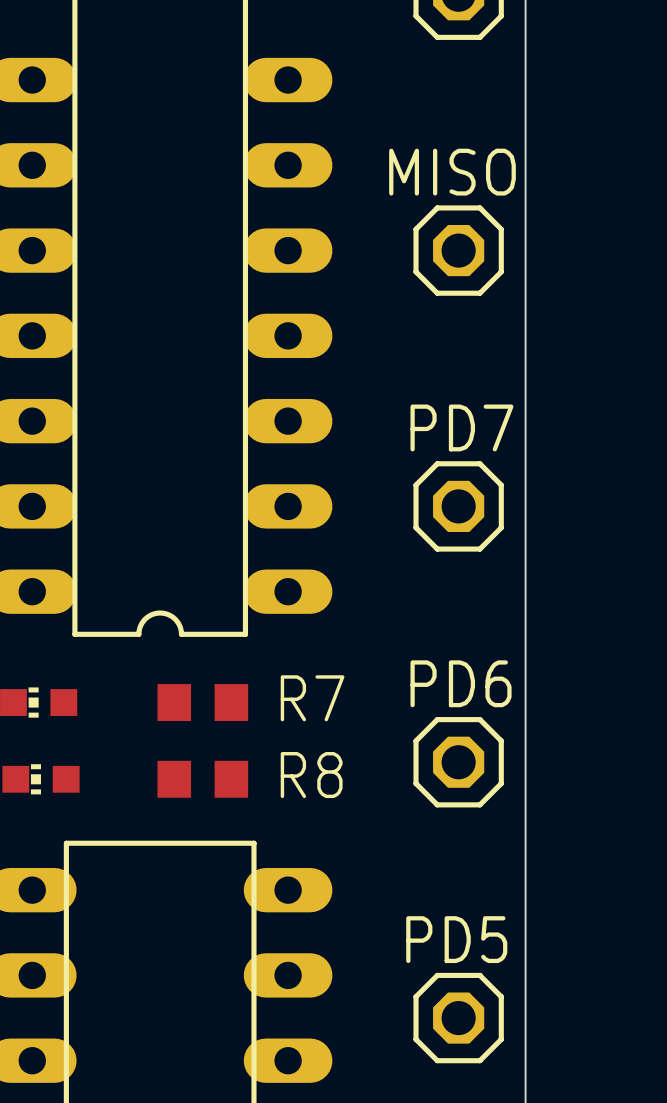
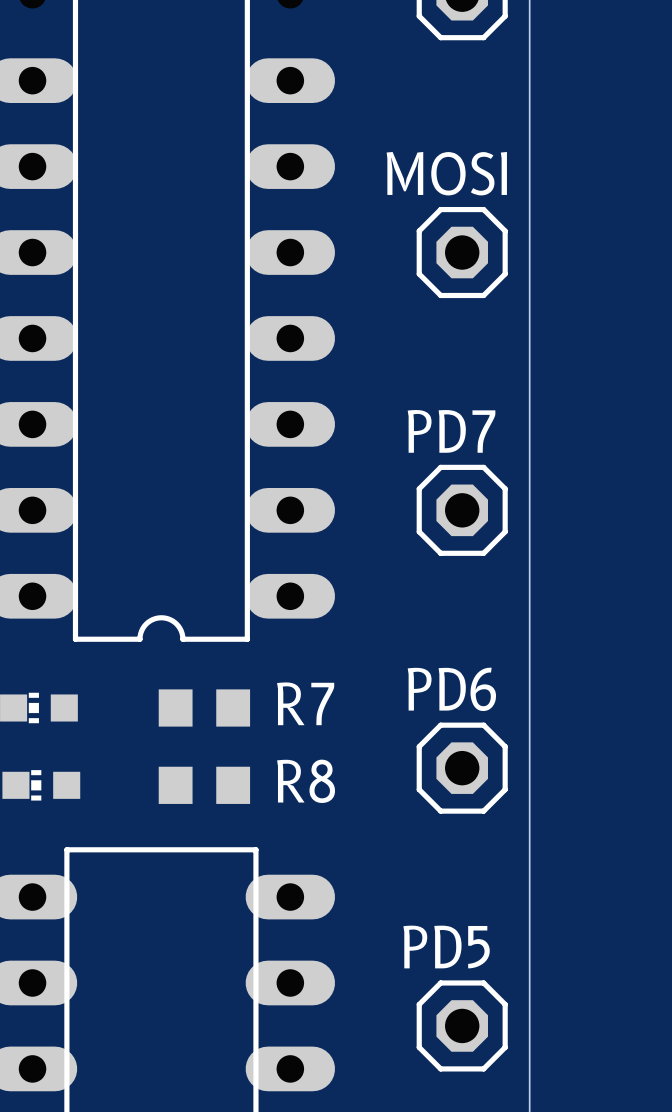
MISO name: MISO (452, 172) -> MOSI (446, 173)

